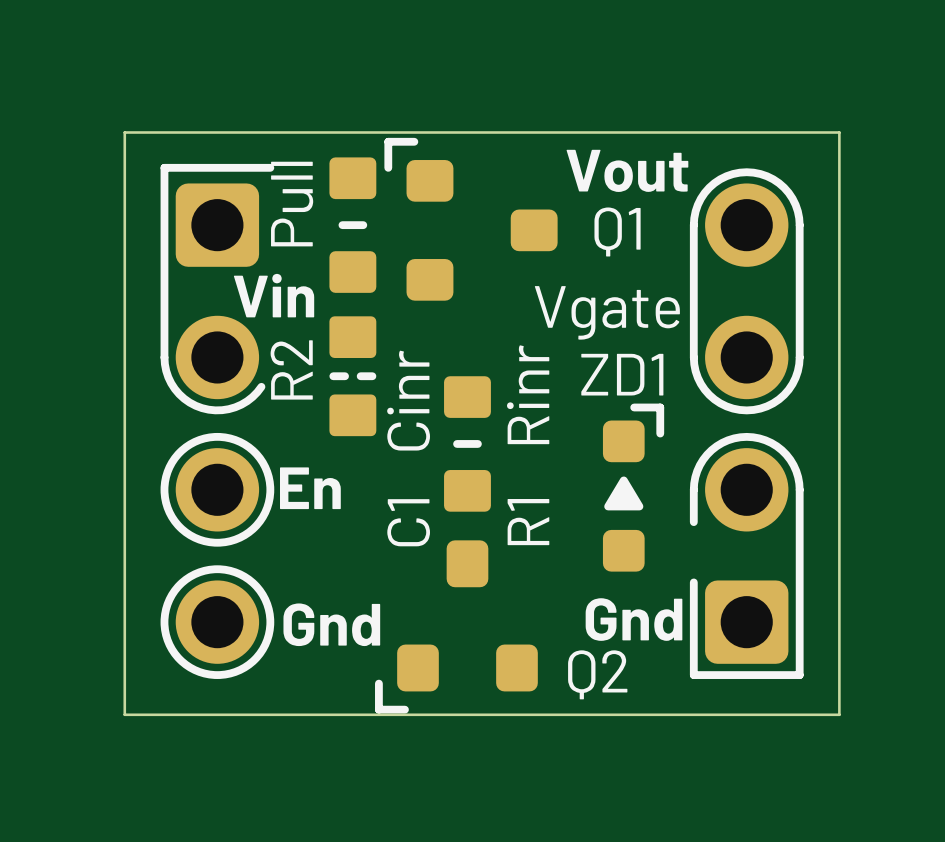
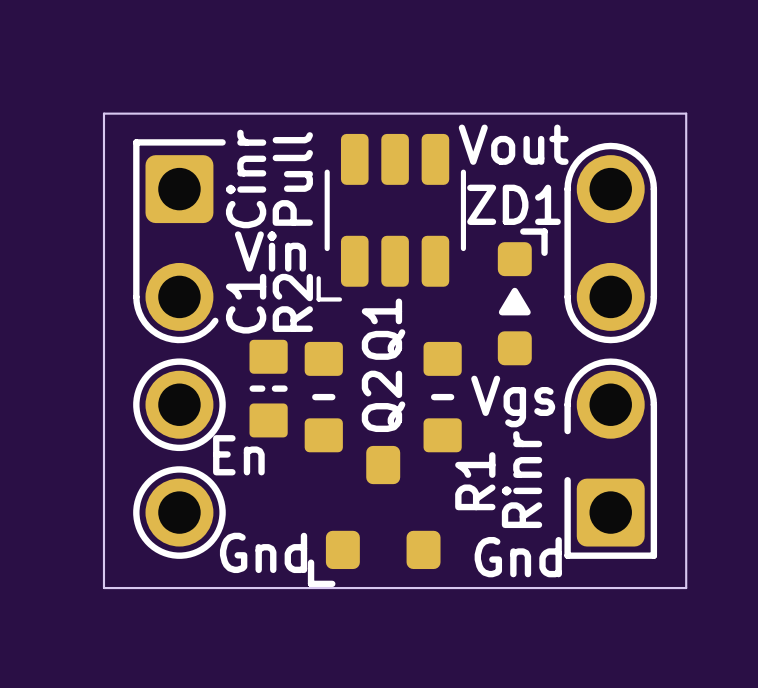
Q1 footprint: [384, 137, 558, 301] -> [316, 133, 466, 302]
R2 value position: Pull (292, 204) -> Pull (292, 179)
R2 position: (352, 225) -> (323, 397)
Q1 name position: Q1 (617, 231) -> Q1 (383, 329)
text position: Vin (274, 295) -> Vin (270, 251)
ZD1 value: Vgate (607, 312) -> Vgs (513, 401)
R2 name position: R2 (291, 369) -> R2 (292, 302)
C1 position: (352, 376) -> (268, 388)
R1 value position: Rinr (528, 394) -> Rinr (522, 479)
C1 value position: Cinr (408, 400) -> Cinr (246, 179)
R1 position: (467, 443) -> (442, 397)
ZD1 position: (633, 487) -> (522, 296)
text position: En (310, 488) -> En (238, 455)
C1 name position: C1 (408, 522) -> C1 (246, 303)
R1 name position: R1 (528, 522) -> R1 (475, 481)
text position: Gnd (634, 619) -> Gnd (518, 557)
text position: Gnd (331, 624) -> Gnd (263, 552)
Q2 name rotation: 0° (597, 674) -> 90° counterclockwise (383, 401)
Q2 name position: Q2 (597, 674) -> Q2 (383, 401)

